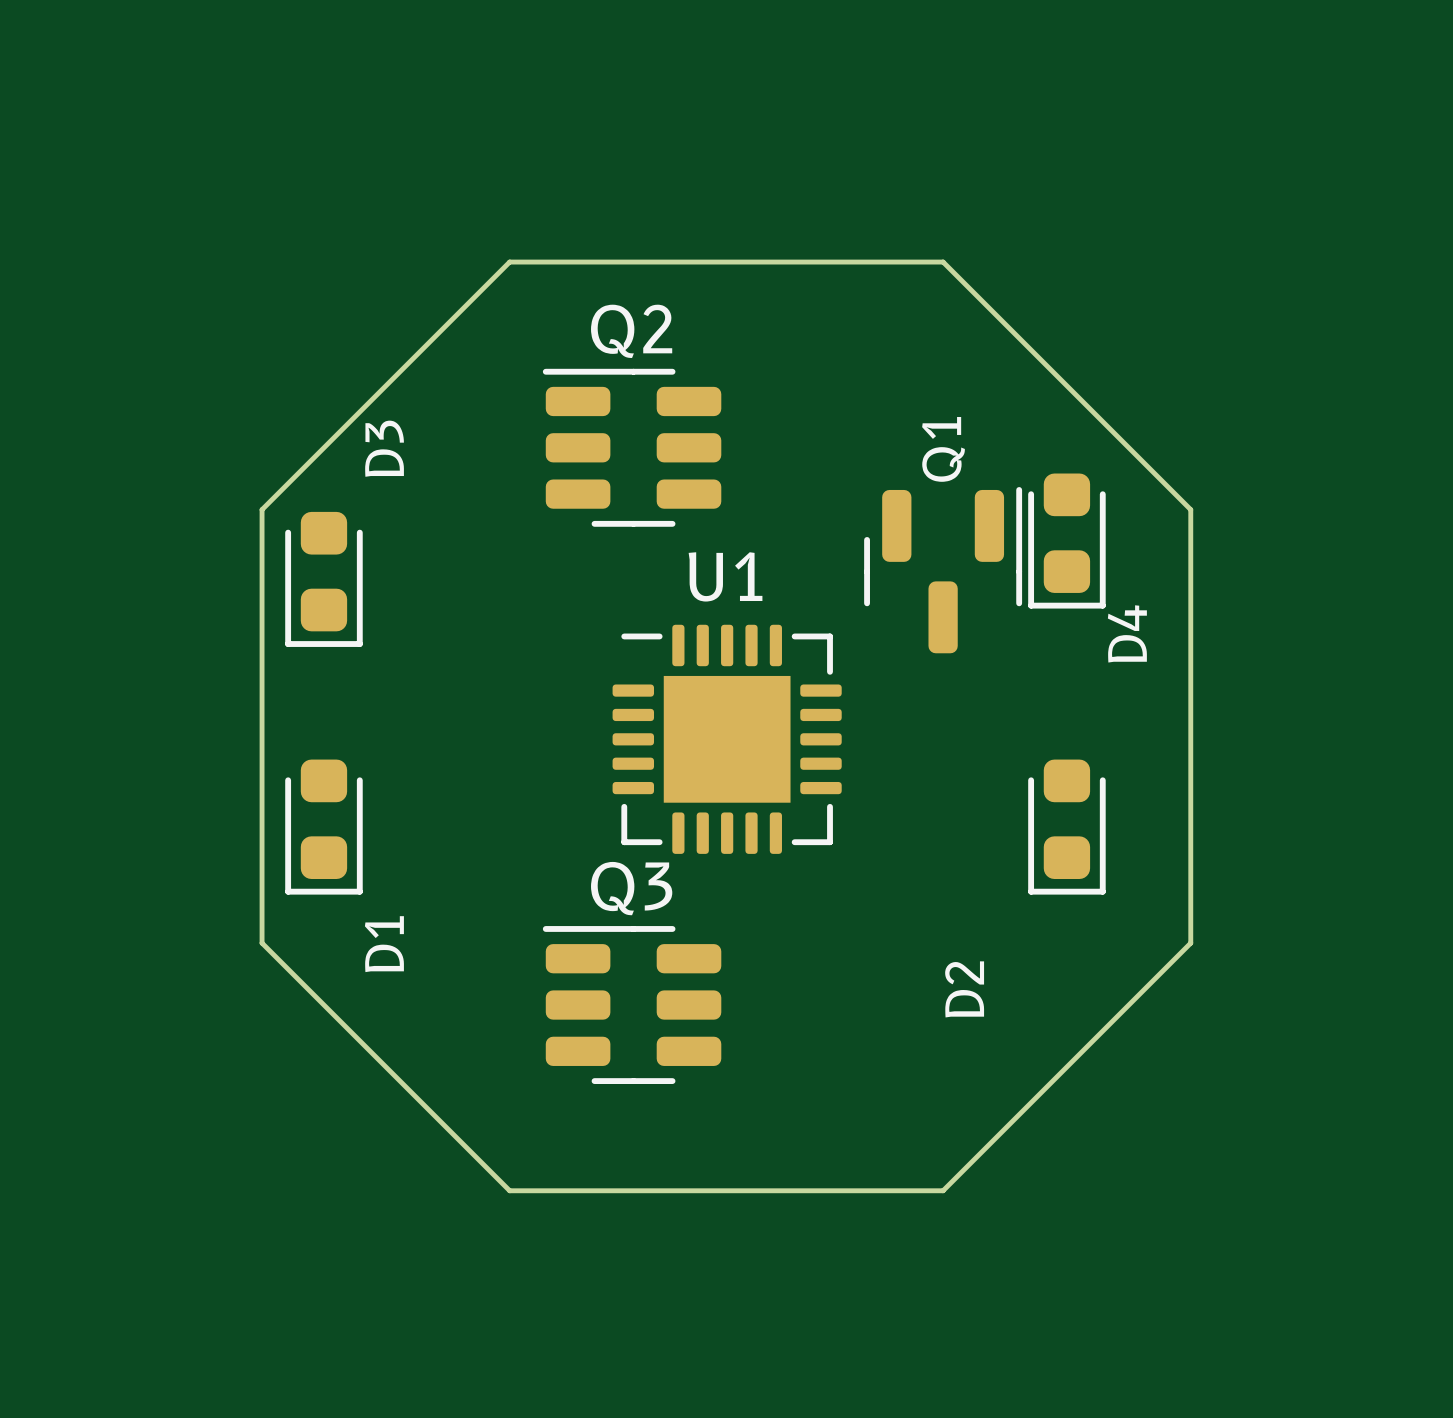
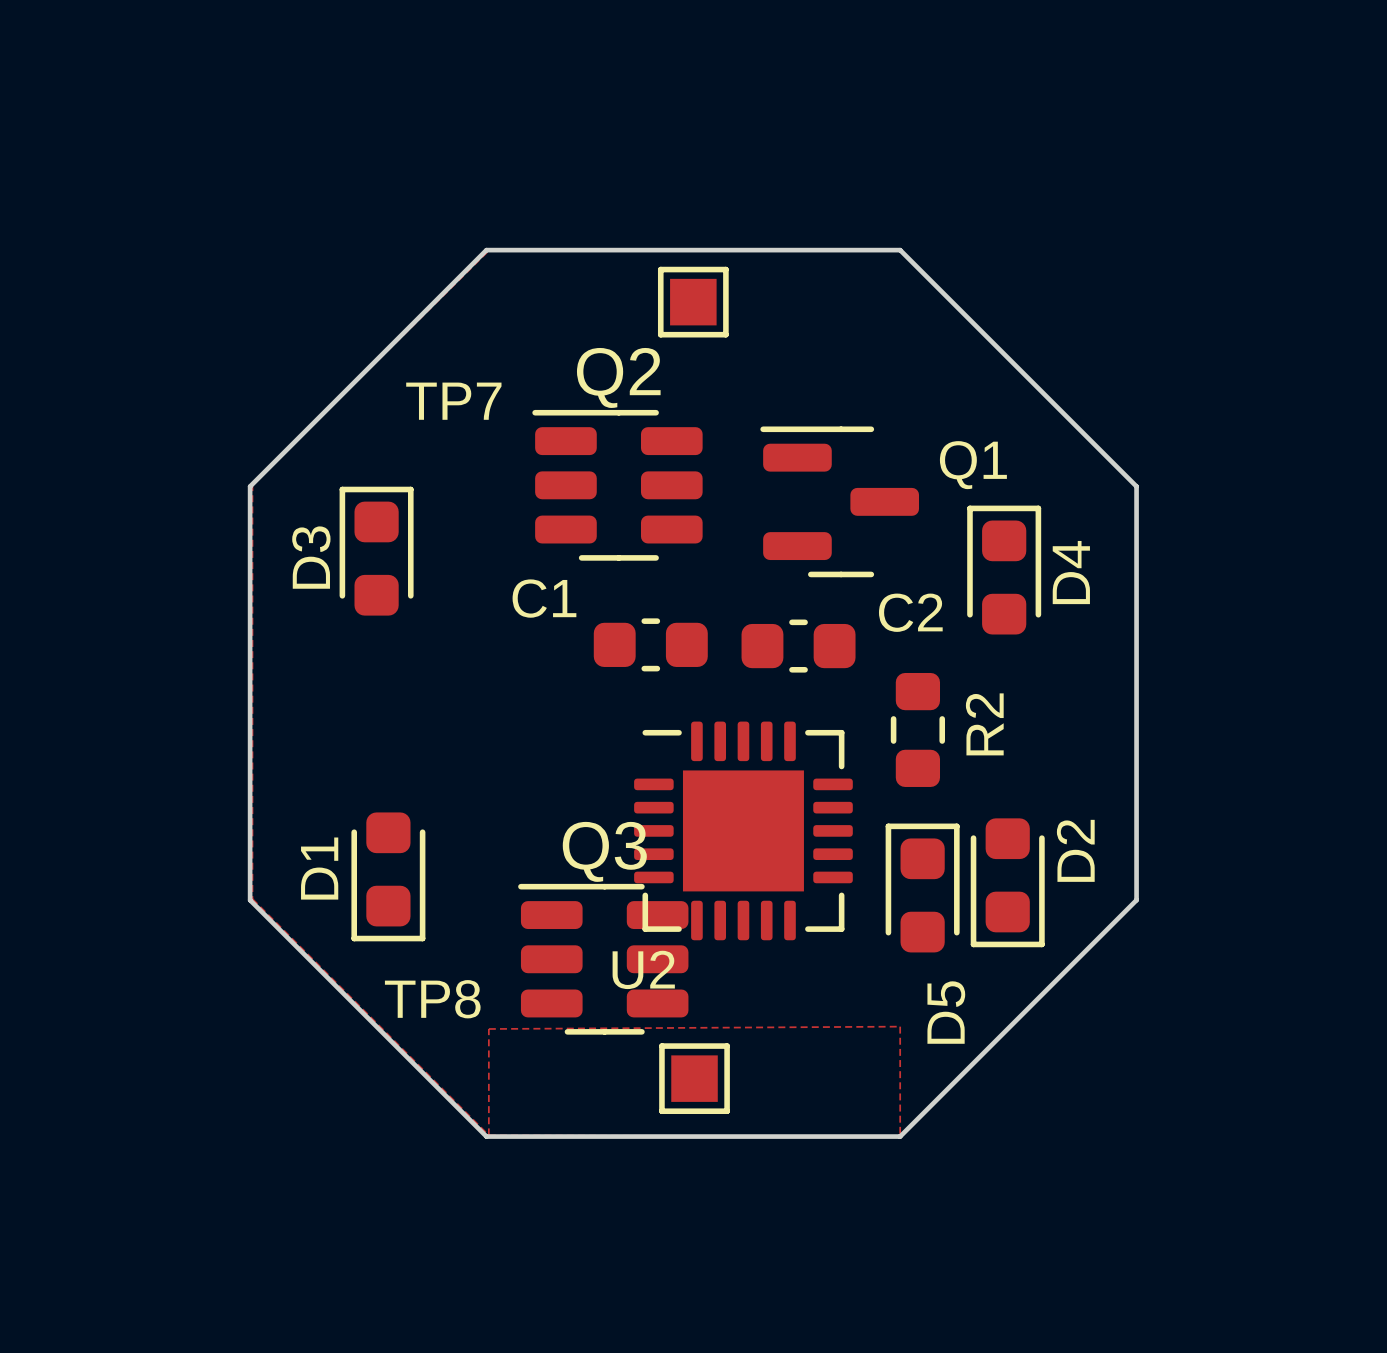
zone outline: none -> (487, 251) (252, 484) (252, 898) (488, 1135)
TP7: none -> (693, 302)
Q2 position: (632, 447) -> (617, 485)
D3 name position: D3 (384, 448) -> D3 (311, 557)
Q1 name position: Q1 (943, 449) -> Q1 (973, 465)
D4 rotation: 0° (1066, 541) -> 180° (1004, 570)
Q1 rotation: 0° (943, 570) -> 90° counterclockwise (839, 501)
D3 rotation: 0° (323, 579) -> 180° (376, 551)
C1: none -> (650, 644)
C2: none -> (798, 646)
U1: (727, 739) -> none
R2: none -> (917, 729)
D1 position: (323, 827) -> (388, 876)
D2 position: (1066, 827) -> (1007, 882)
U2: none -> (743, 830)
D5: none -> (922, 888)
D1 name position: D1 (384, 944) -> D1 (319, 868)
D2 name position: D2 (964, 989) -> D2 (1075, 850)
TP8: none -> (694, 1078)
zone outline: none -> (488, 1135) (488, 1029) (900, 1026) (900, 1136) (488, 1135)

